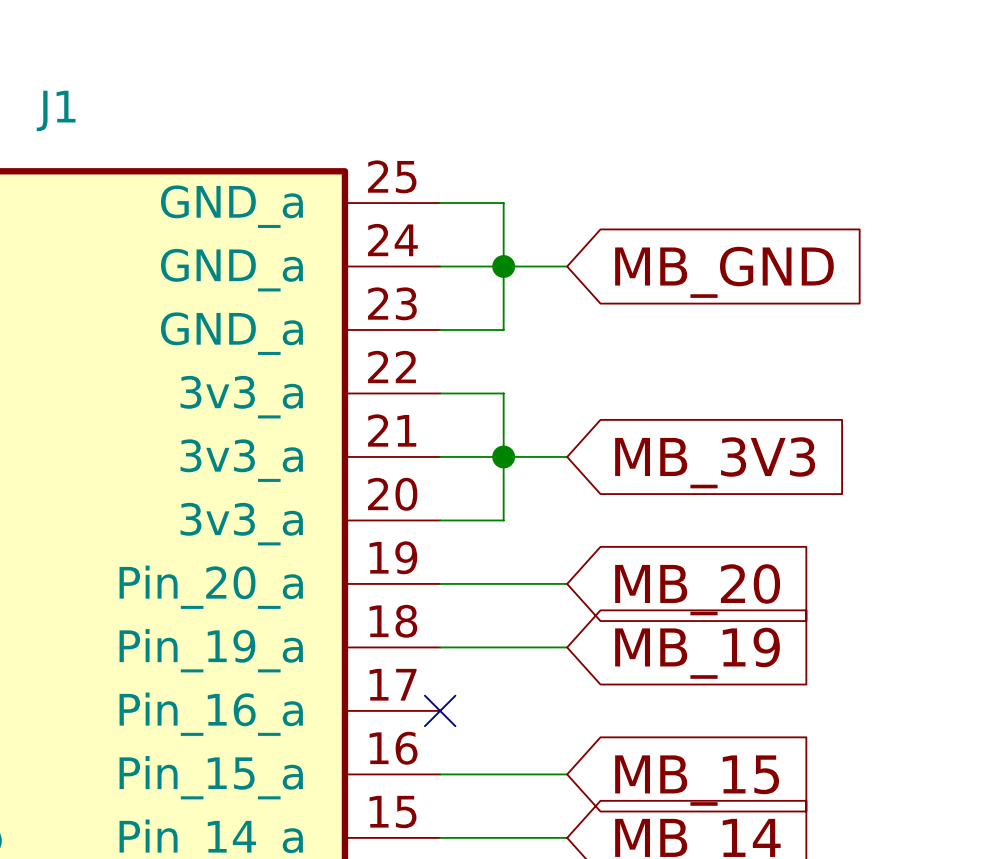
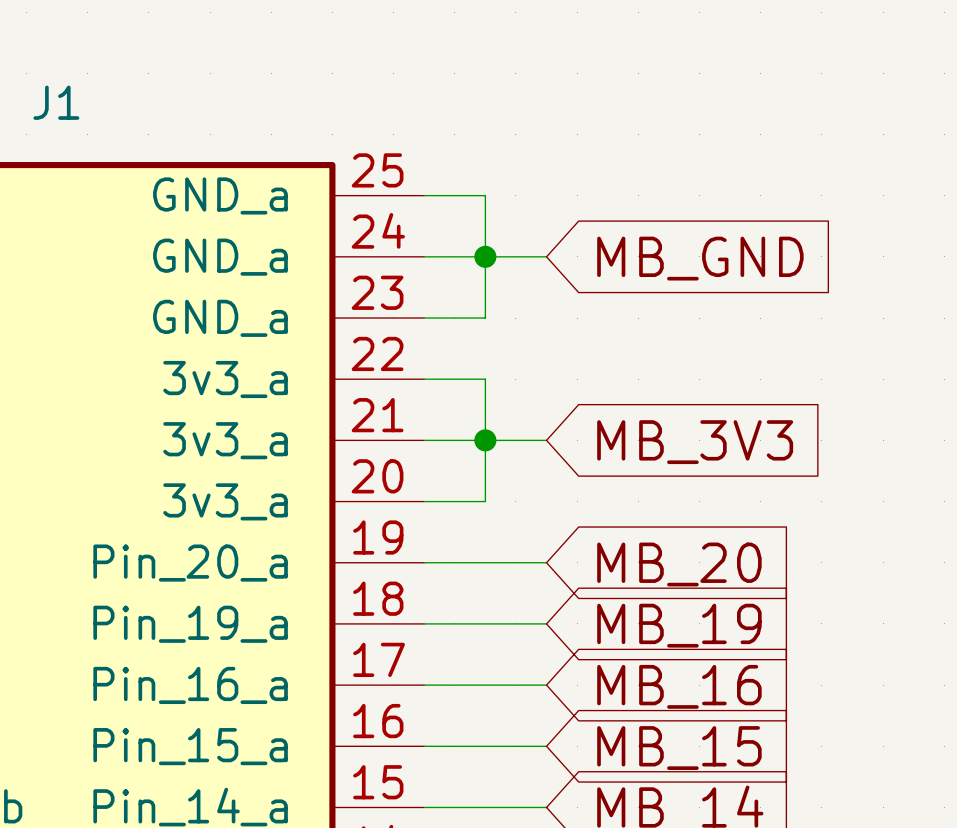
wire: none -> (424, 685) (546, 685)
no-connect mark: (440, 710) -> none
global label: none -> MB_16 (679, 686)

